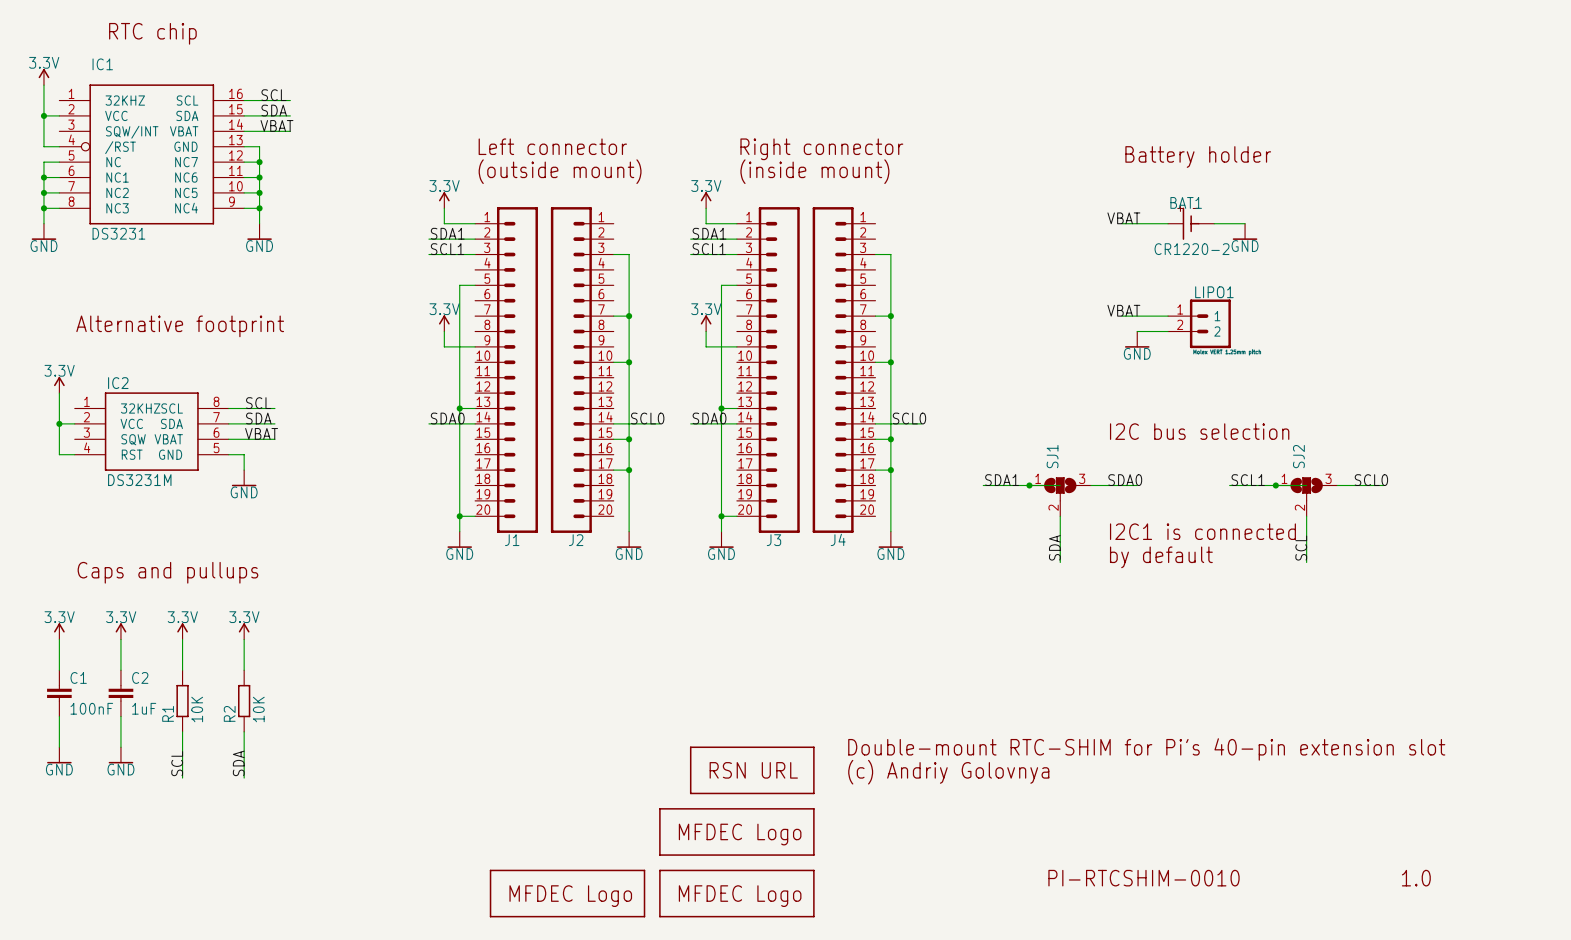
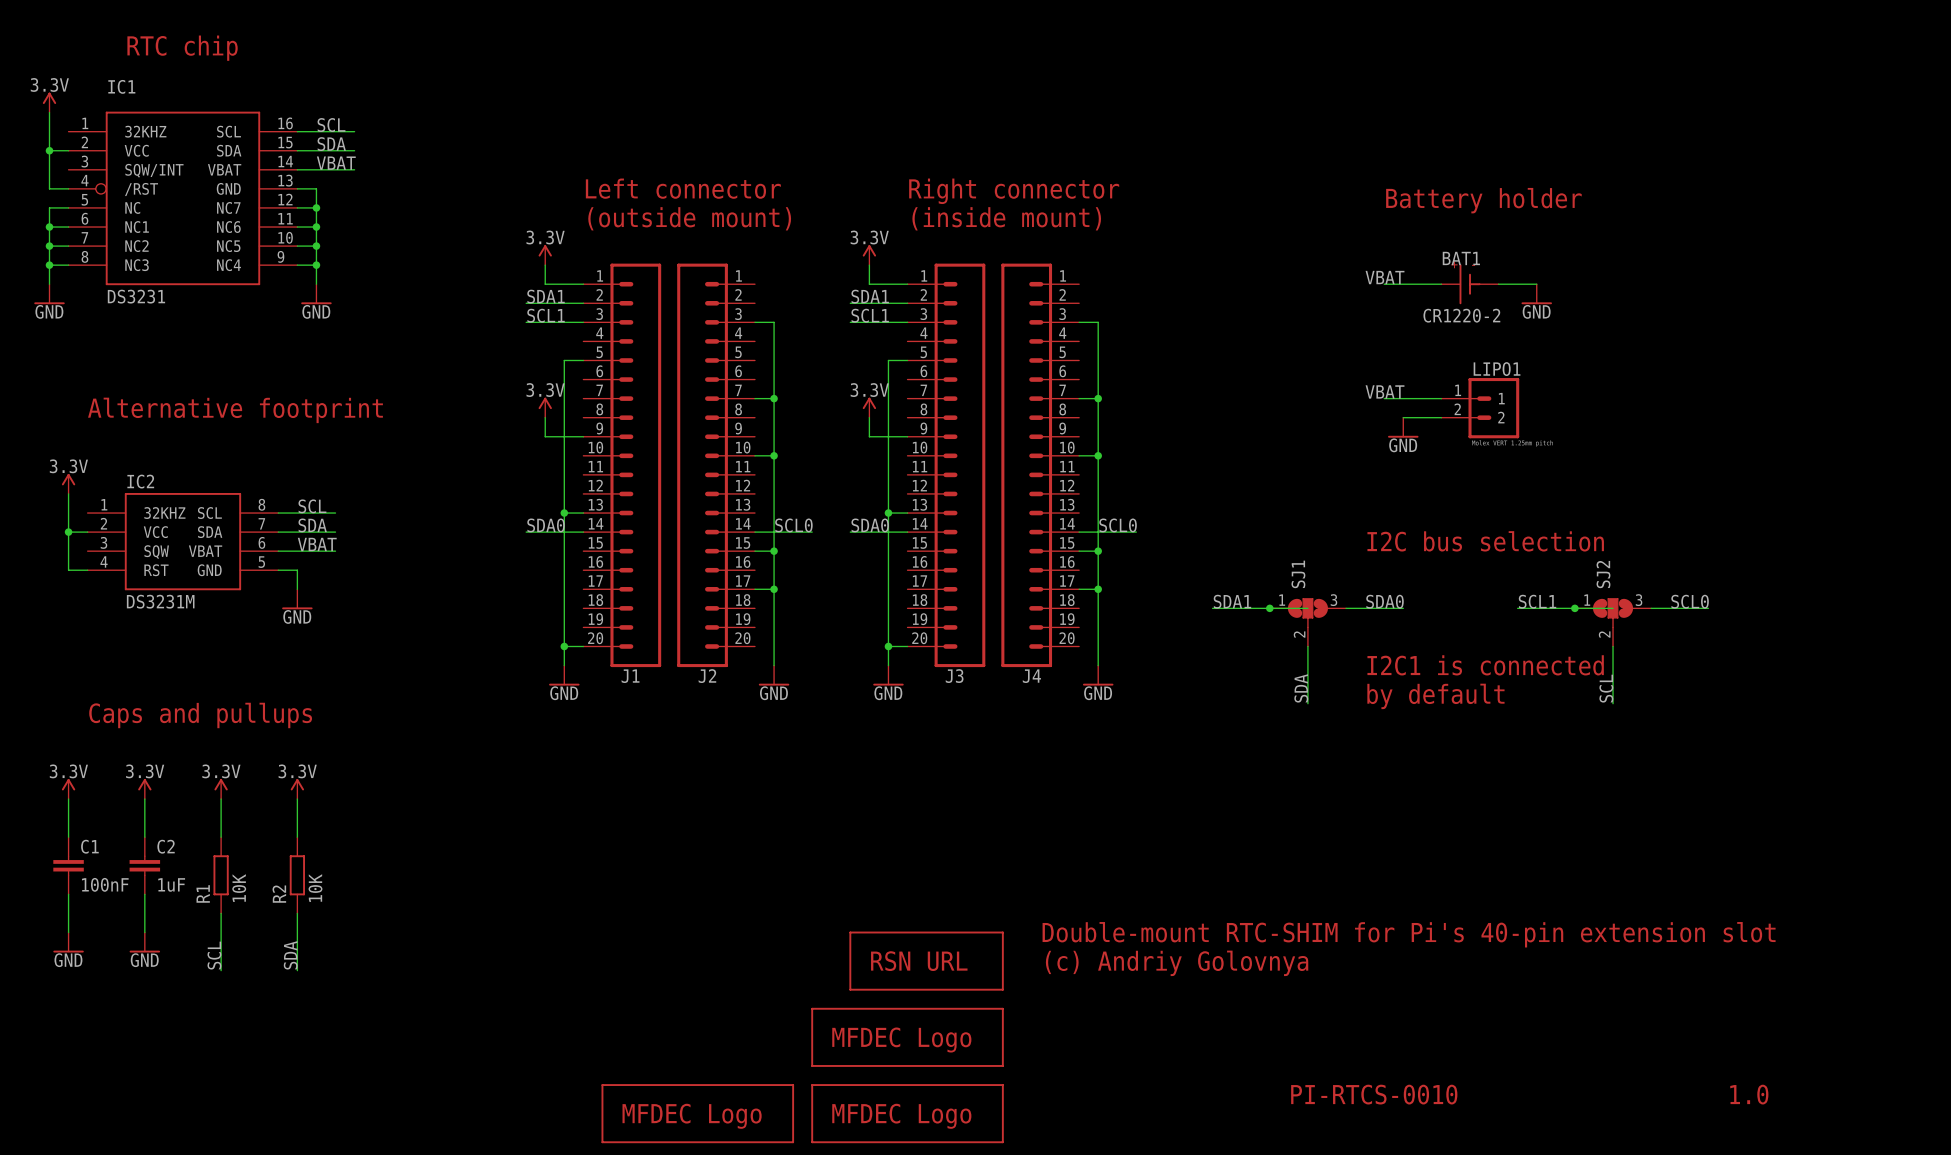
text: PI-RTCSHIM-0010 (1144, 878) -> PI-RTCS-0010 (1374, 1094)

